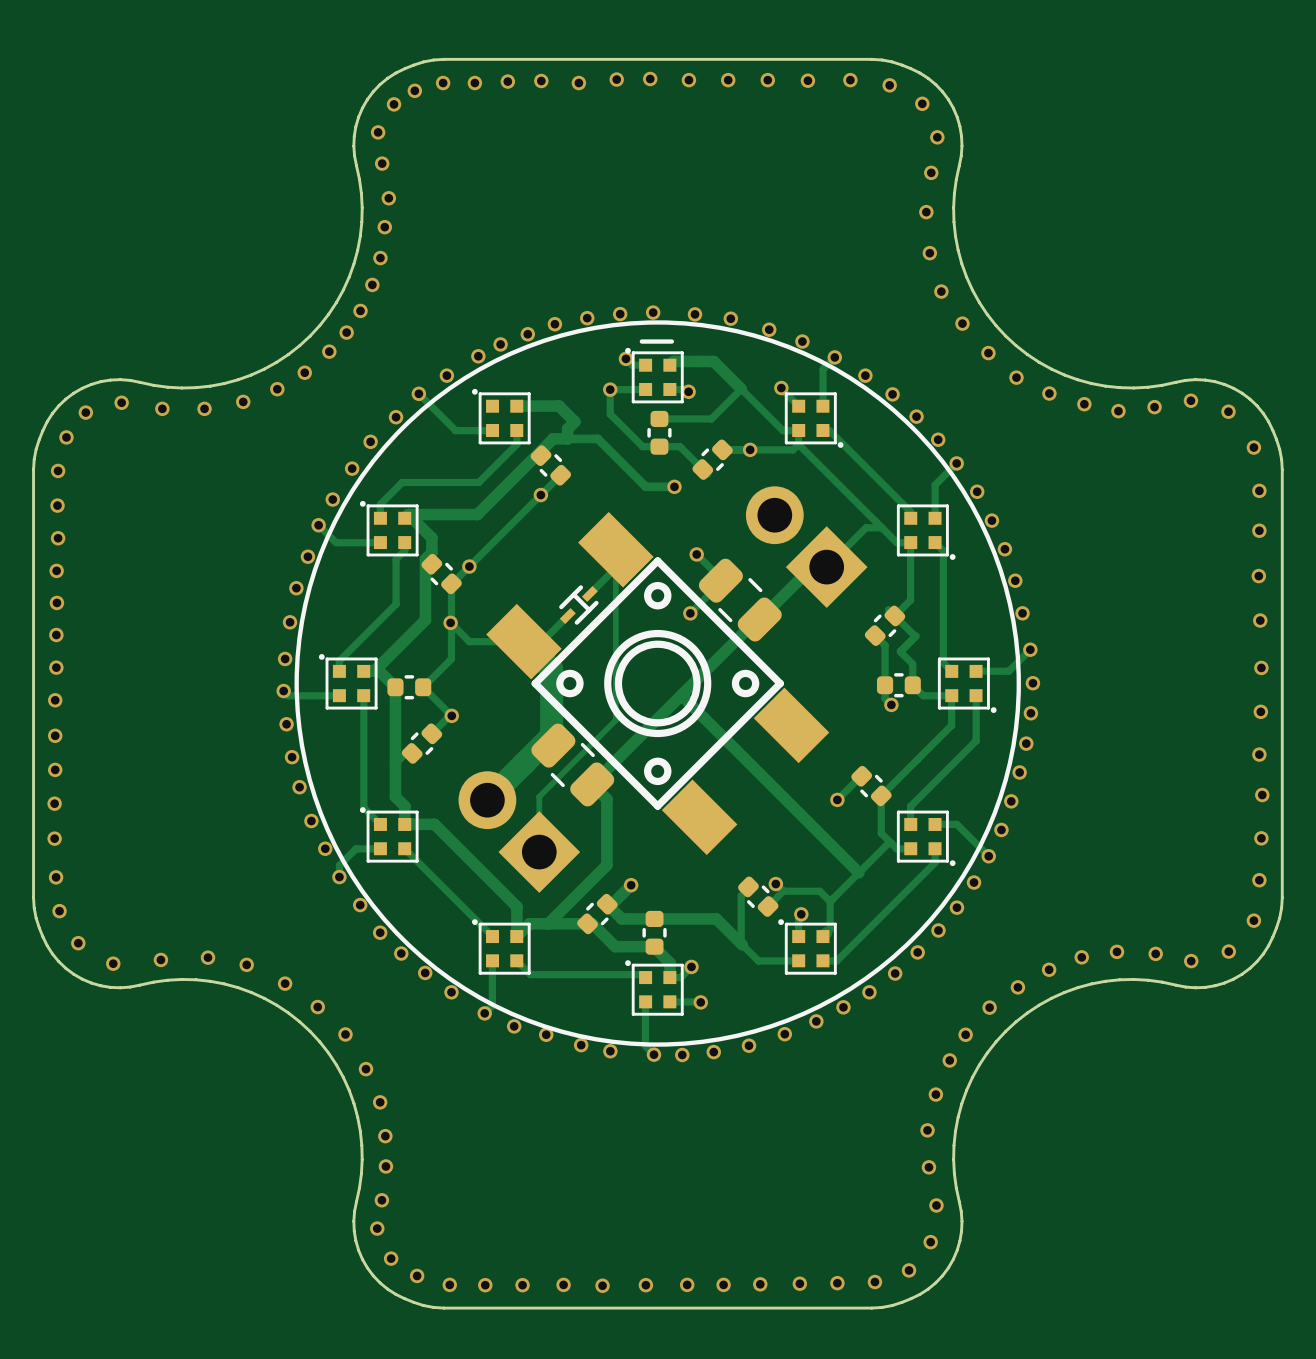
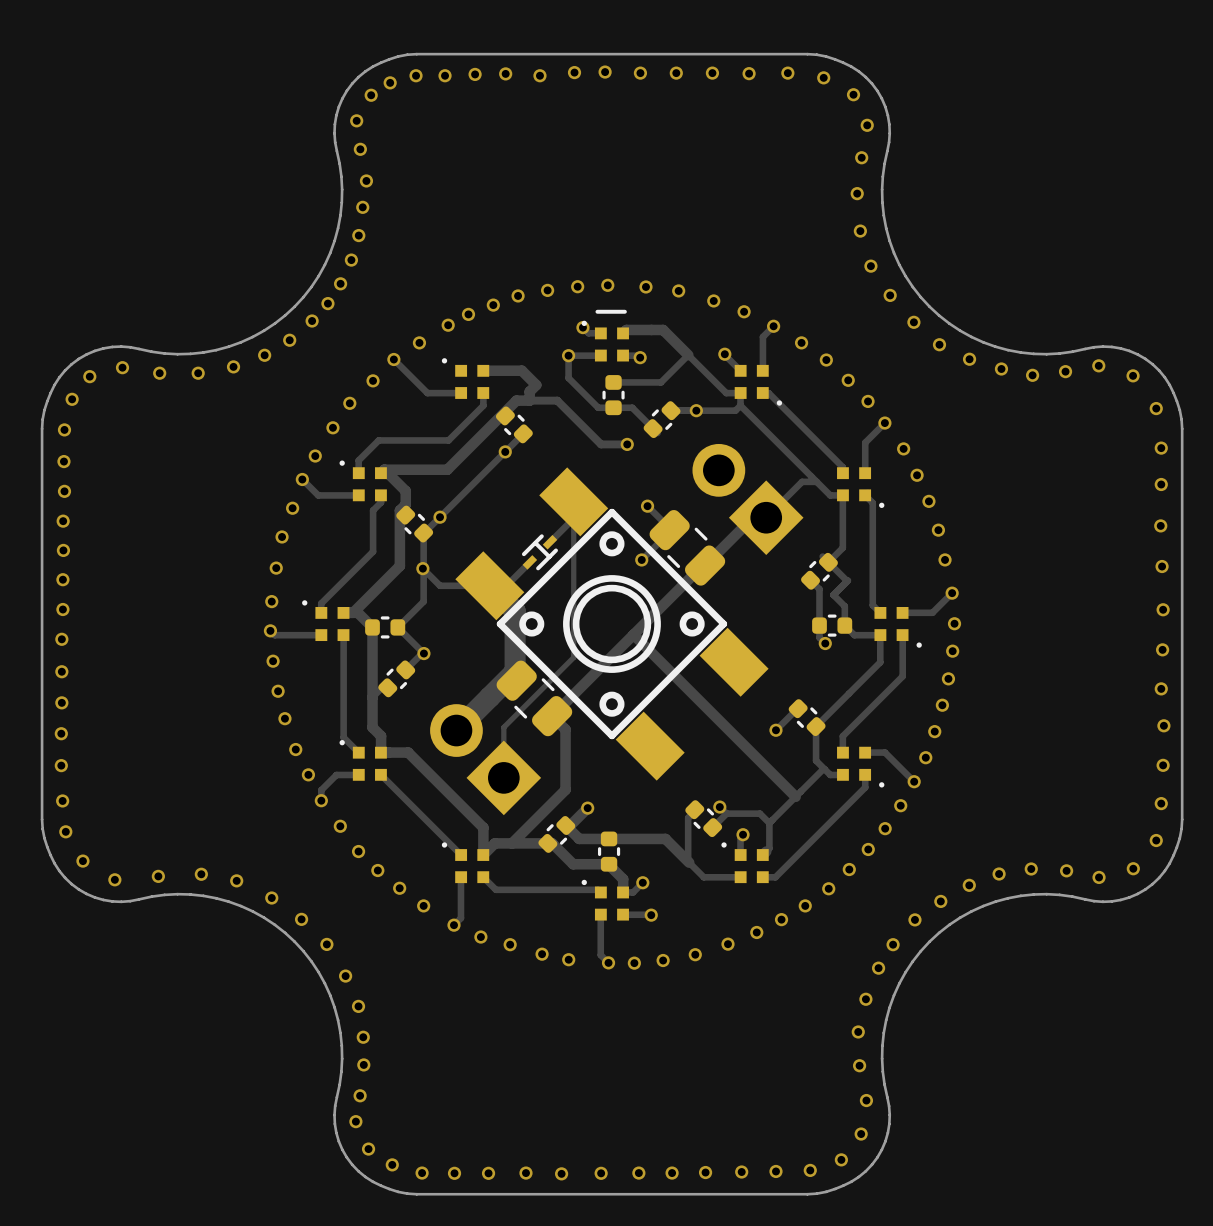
drawing: [294, 320, 1021, 1047] -> none
part footprint: [625, 347, 684, 404] -> [581, 320, 629, 362]
part footprint: [472, 388, 531, 445] -> [441, 358, 490, 399]
part footprint: [784, 392, 844, 448] -> [734, 364, 783, 406]
part footprint: [359, 500, 419, 557] -> [339, 460, 387, 502]
part footprint: [896, 504, 956, 560] -> [837, 467, 885, 508]
part footprint: [318, 654, 378, 710] -> [302, 600, 350, 642]
part footprint: [937, 657, 997, 713] -> [874, 606, 922, 648]
part footprint: [359, 807, 419, 863] -> [339, 740, 387, 781]
part footprint: [896, 810, 956, 867] -> [837, 746, 885, 788]
part footprint: [472, 919, 531, 975] -> [441, 842, 490, 884]
part footprint: [778, 919, 837, 975] -> [721, 842, 769, 884]
part footprint: [625, 960, 684, 1016] -> [581, 879, 629, 921]

